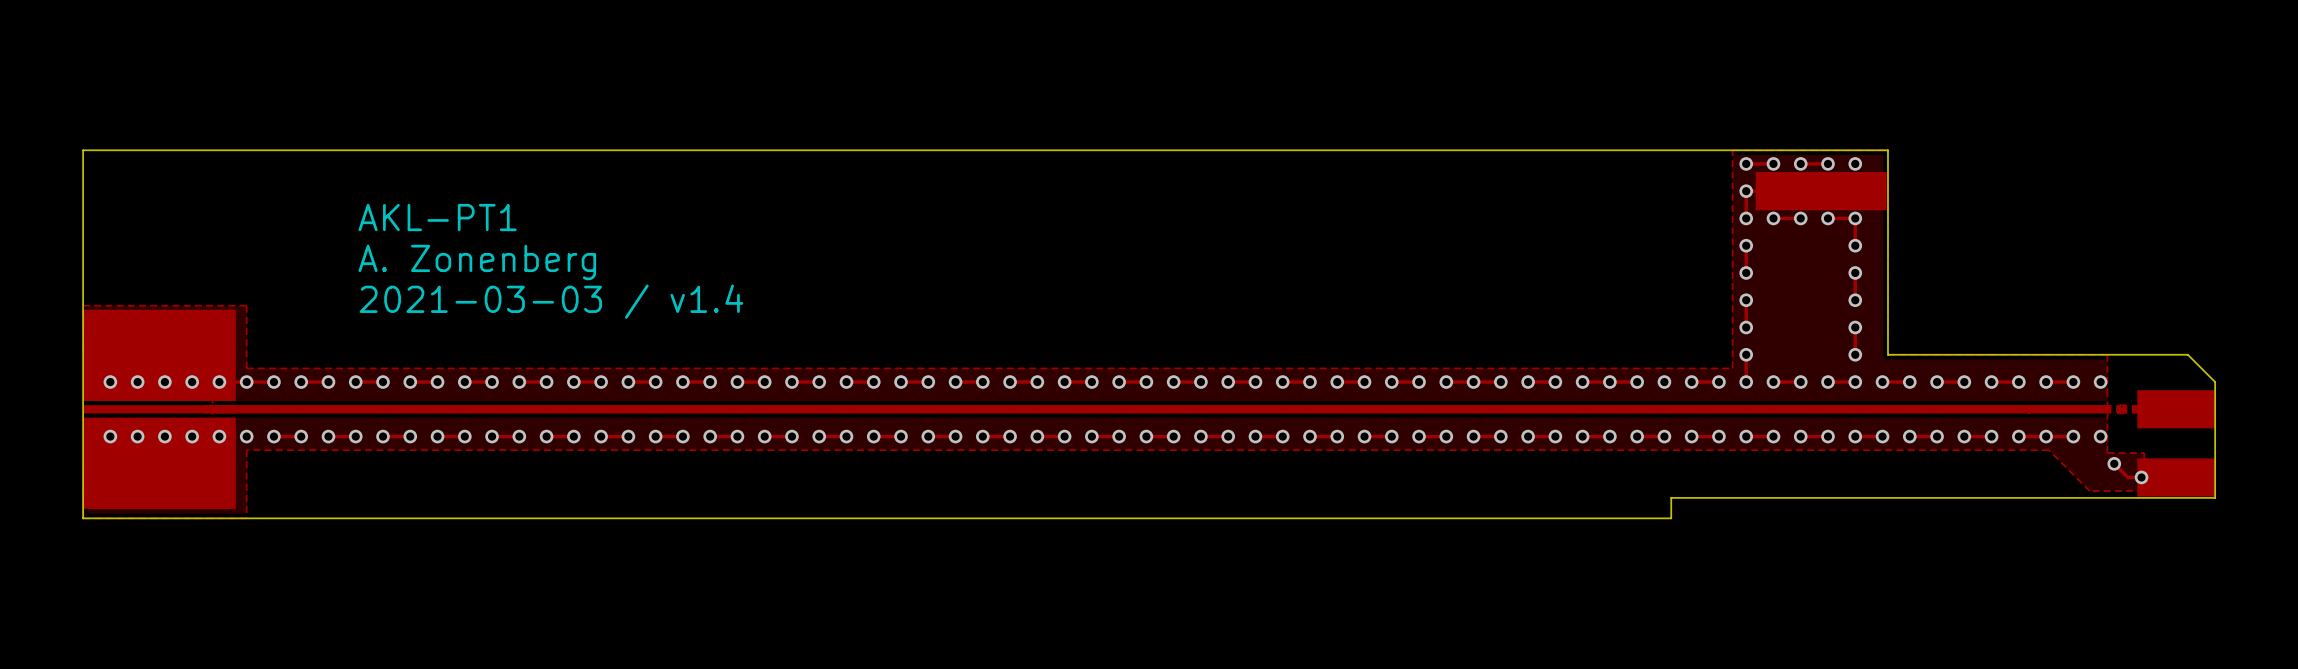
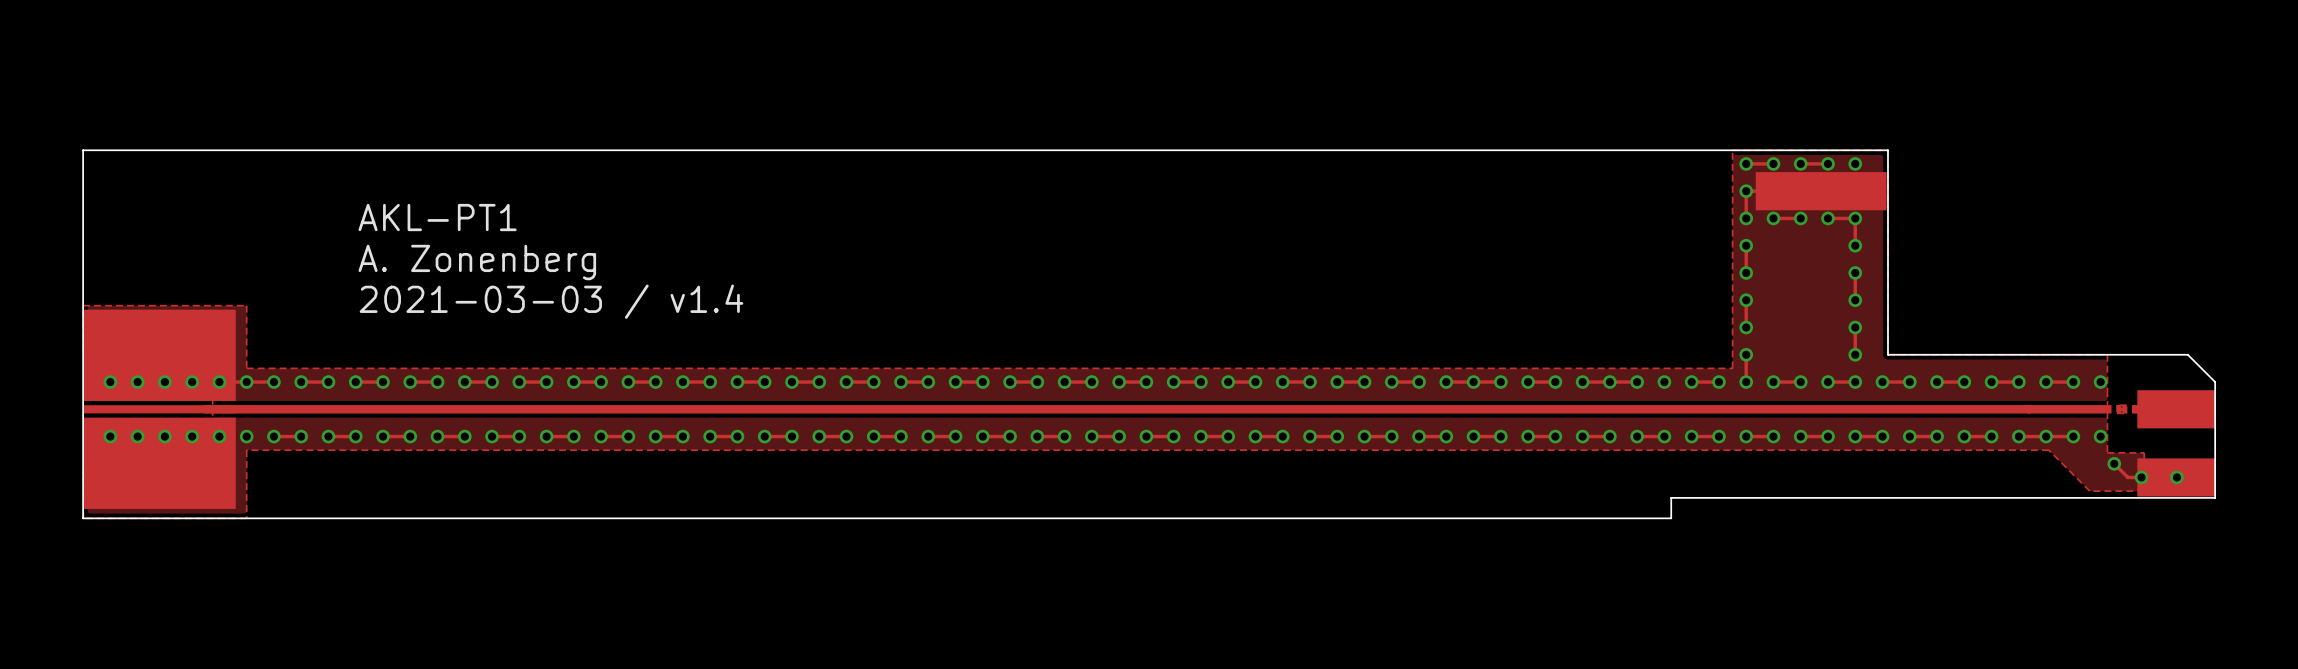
via: none -> (2176, 477)

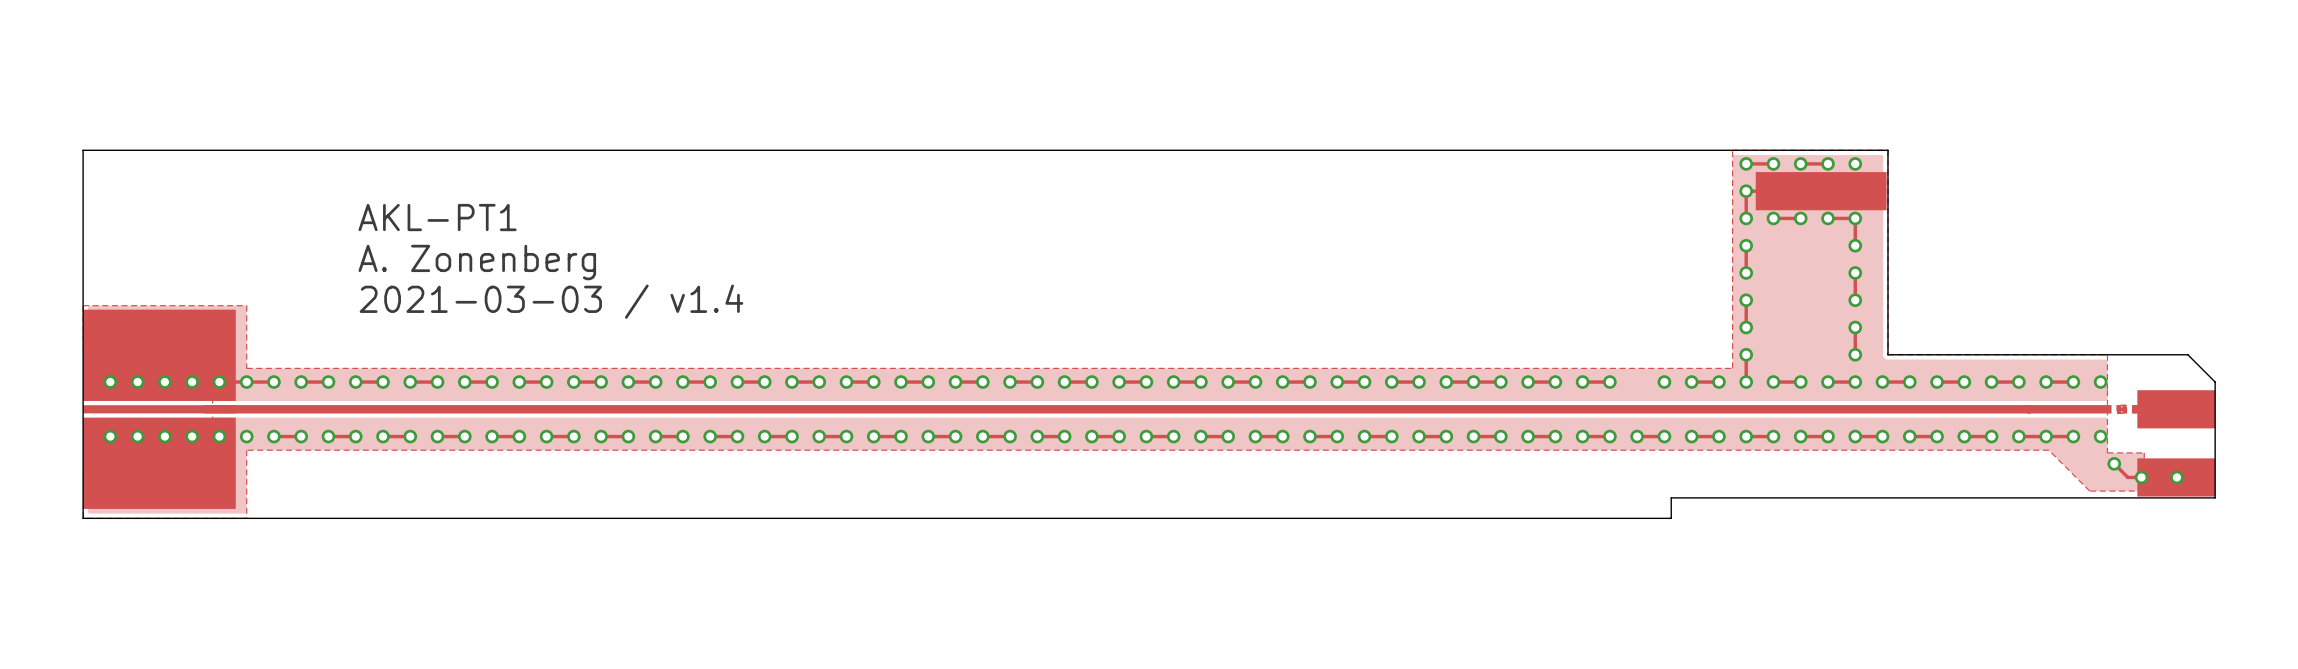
track: (1609, 382) (1637, 382) -> none
via: (1637, 382) -> none

